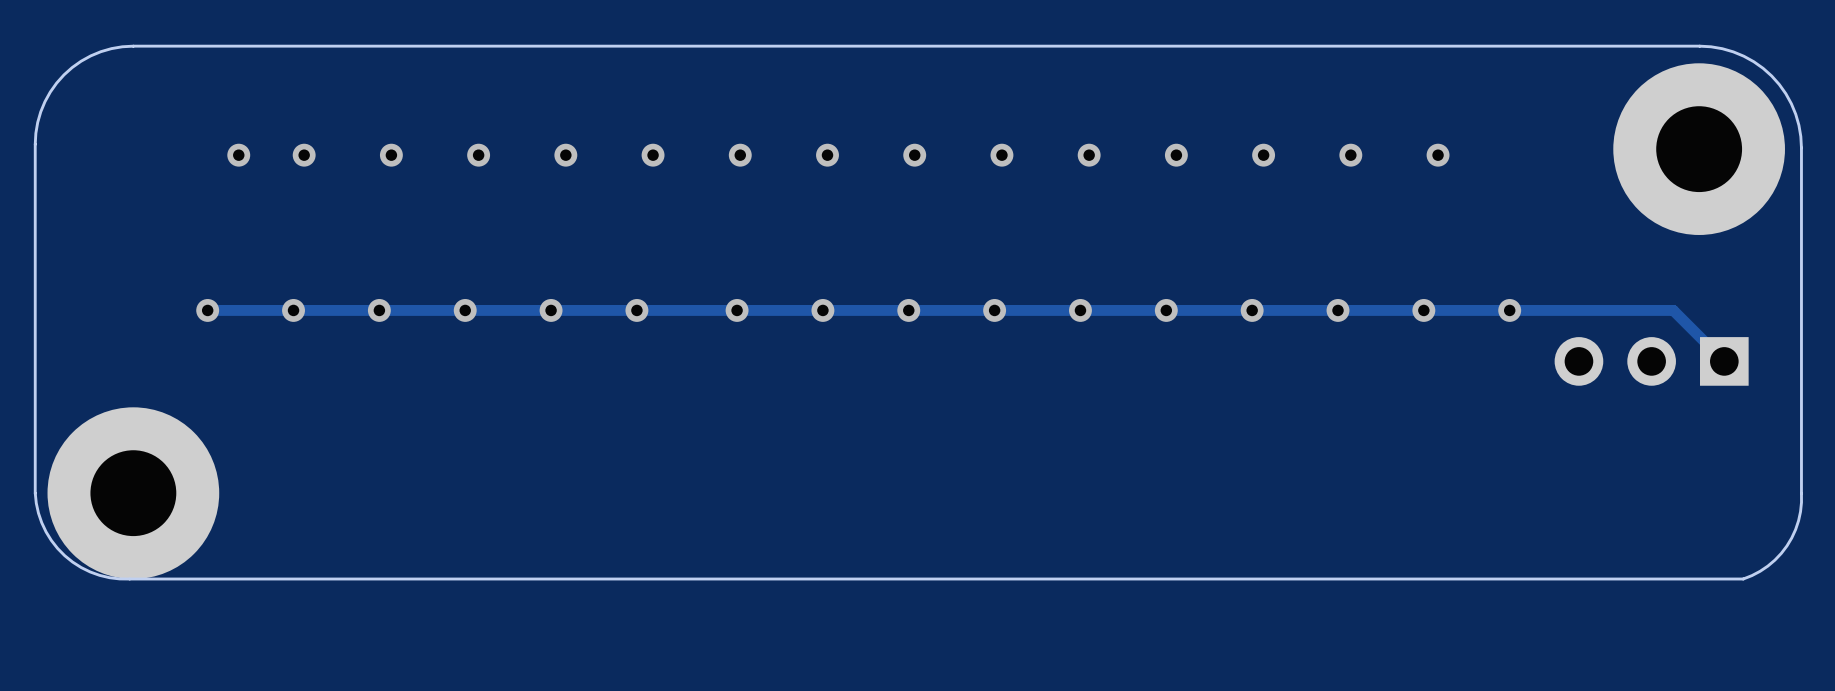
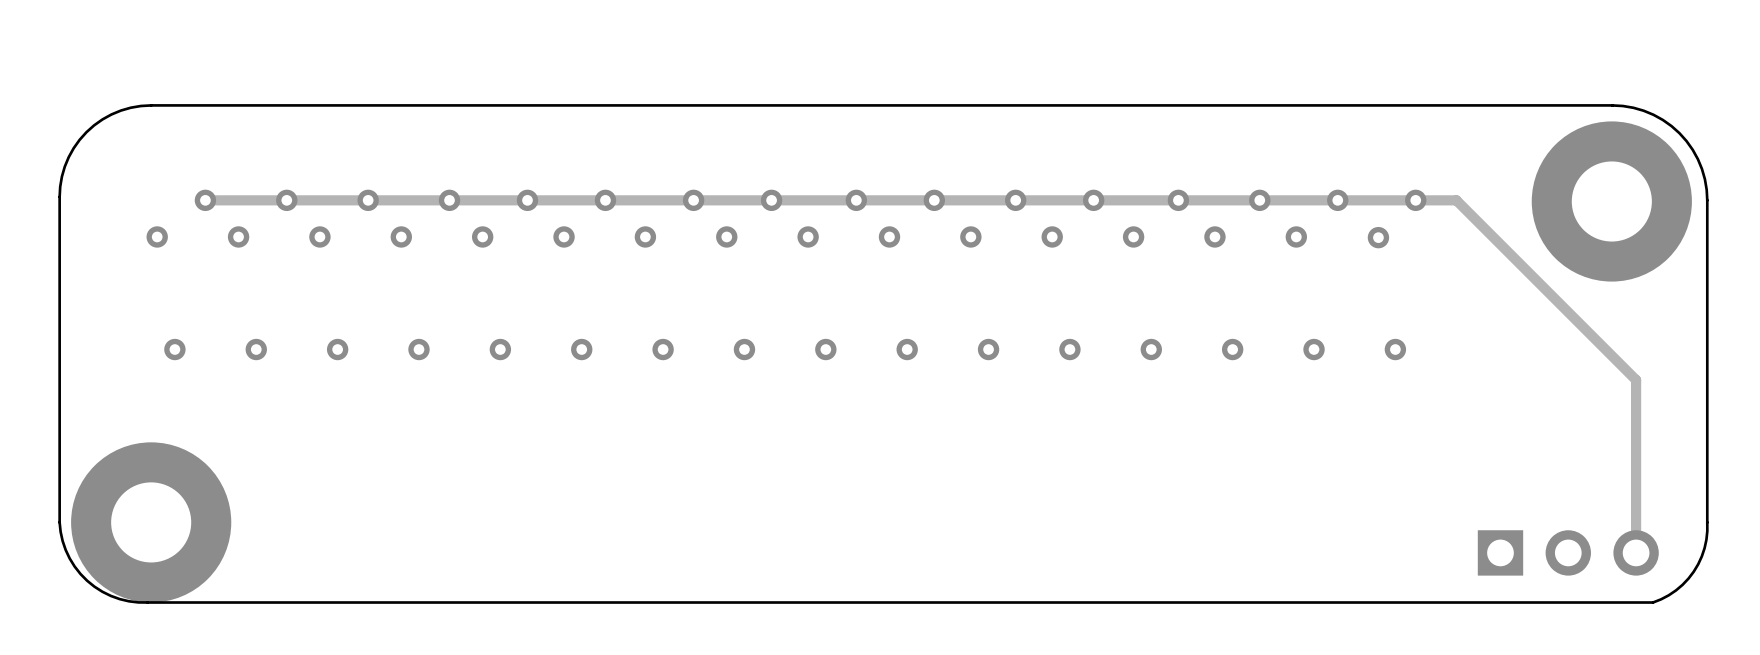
track: none -> (205, 200) (1456, 200) (1636, 380) (1636, 552)
via: none -> (205, 200)
via: none -> (286, 200)
via: none -> (368, 200)
via: none -> (449, 200)
via: none -> (527, 200)
via: none -> (605, 200)
via: none -> (693, 200)
via: none -> (771, 200)
via: none -> (856, 200)
via: none -> (934, 200)
via: none -> (1015, 200)
via: none -> (1093, 200)
via: none -> (1178, 200)
via: none -> (1259, 200)
via: none -> (1337, 200)
via: none -> (1415, 200)
via: (238, 155) -> none
via: (304, 155) -> none
via: (391, 155) -> none
via: (478, 155) -> none
via: (565, 155) -> none
via: (653, 155) -> none
via: (740, 155) -> none
via: (827, 155) -> none
via: (914, 155) -> none
via: (1001, 155) -> none
via: (1089, 155) -> none
via: (1176, 155) -> none
via: (1263, 155) -> none
via: (1350, 155) -> none
via: (1438, 155) -> none
via: none -> (157, 236)
via: none -> (238, 236)
via: none -> (319, 236)
via: none -> (401, 236)
via: none -> (482, 236)
via: none -> (564, 236)
via: none -> (645, 236)
via: none -> (726, 236)
via: none -> (808, 236)
via: none -> (889, 236)
via: none -> (970, 236)
via: none -> (1052, 236)
via: none -> (1133, 236)
via: none -> (1214, 236)
via: none -> (1296, 236)
via: none -> (1378, 237)
via: none -> (174, 349)
via: none -> (256, 349)
via: none -> (337, 349)
via: none -> (419, 349)
via: none -> (500, 349)
via: none -> (581, 349)
via: none -> (663, 349)
via: none -> (744, 349)
via: none -> (825, 349)
via: none -> (907, 349)
via: none -> (988, 349)
via: none -> (1069, 349)
via: none -> (1151, 349)
via: none -> (1232, 349)
via: none -> (1314, 349)
via: none -> (1395, 349)
track: (207, 310) (1673, 310) (1724, 361) -> none
via: (207, 310) -> none
via: (293, 310) -> none
via: (379, 310) -> none
via: (465, 310) -> none
via: (551, 310) -> none
via: (636, 310) -> none
via: (737, 310) -> none
via: (822, 310) -> none
via: (908, 310) -> none
via: (994, 310) -> none
via: (1080, 310) -> none
via: (1166, 310) -> none
via: (1252, 310) -> none
via: (1338, 310) -> none
via: (1423, 310) -> none
via: (1509, 310) -> none
part rotation: 0° (1651, 361) -> 180° (1568, 552)
part position: (1651, 361) -> (1568, 552)

